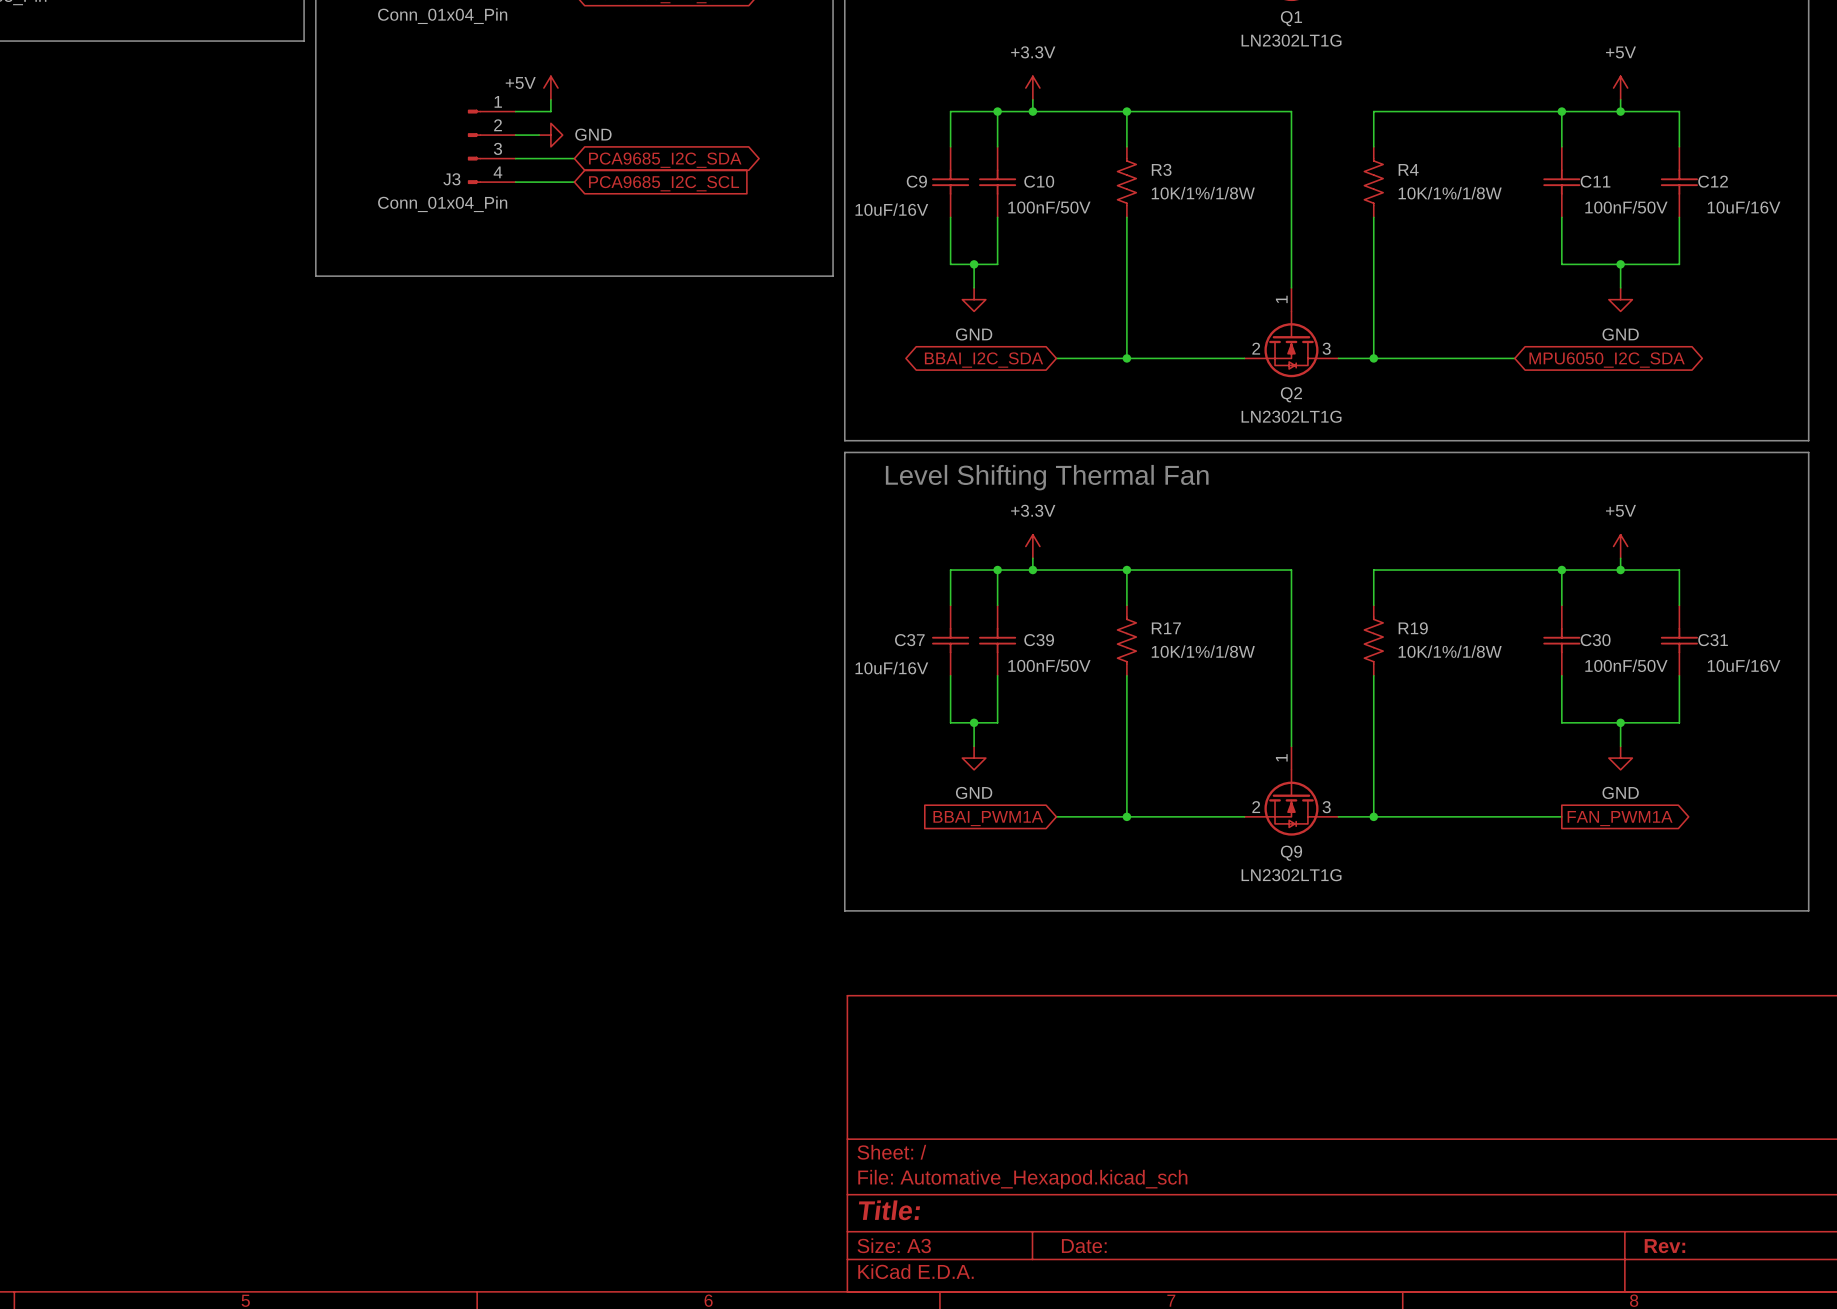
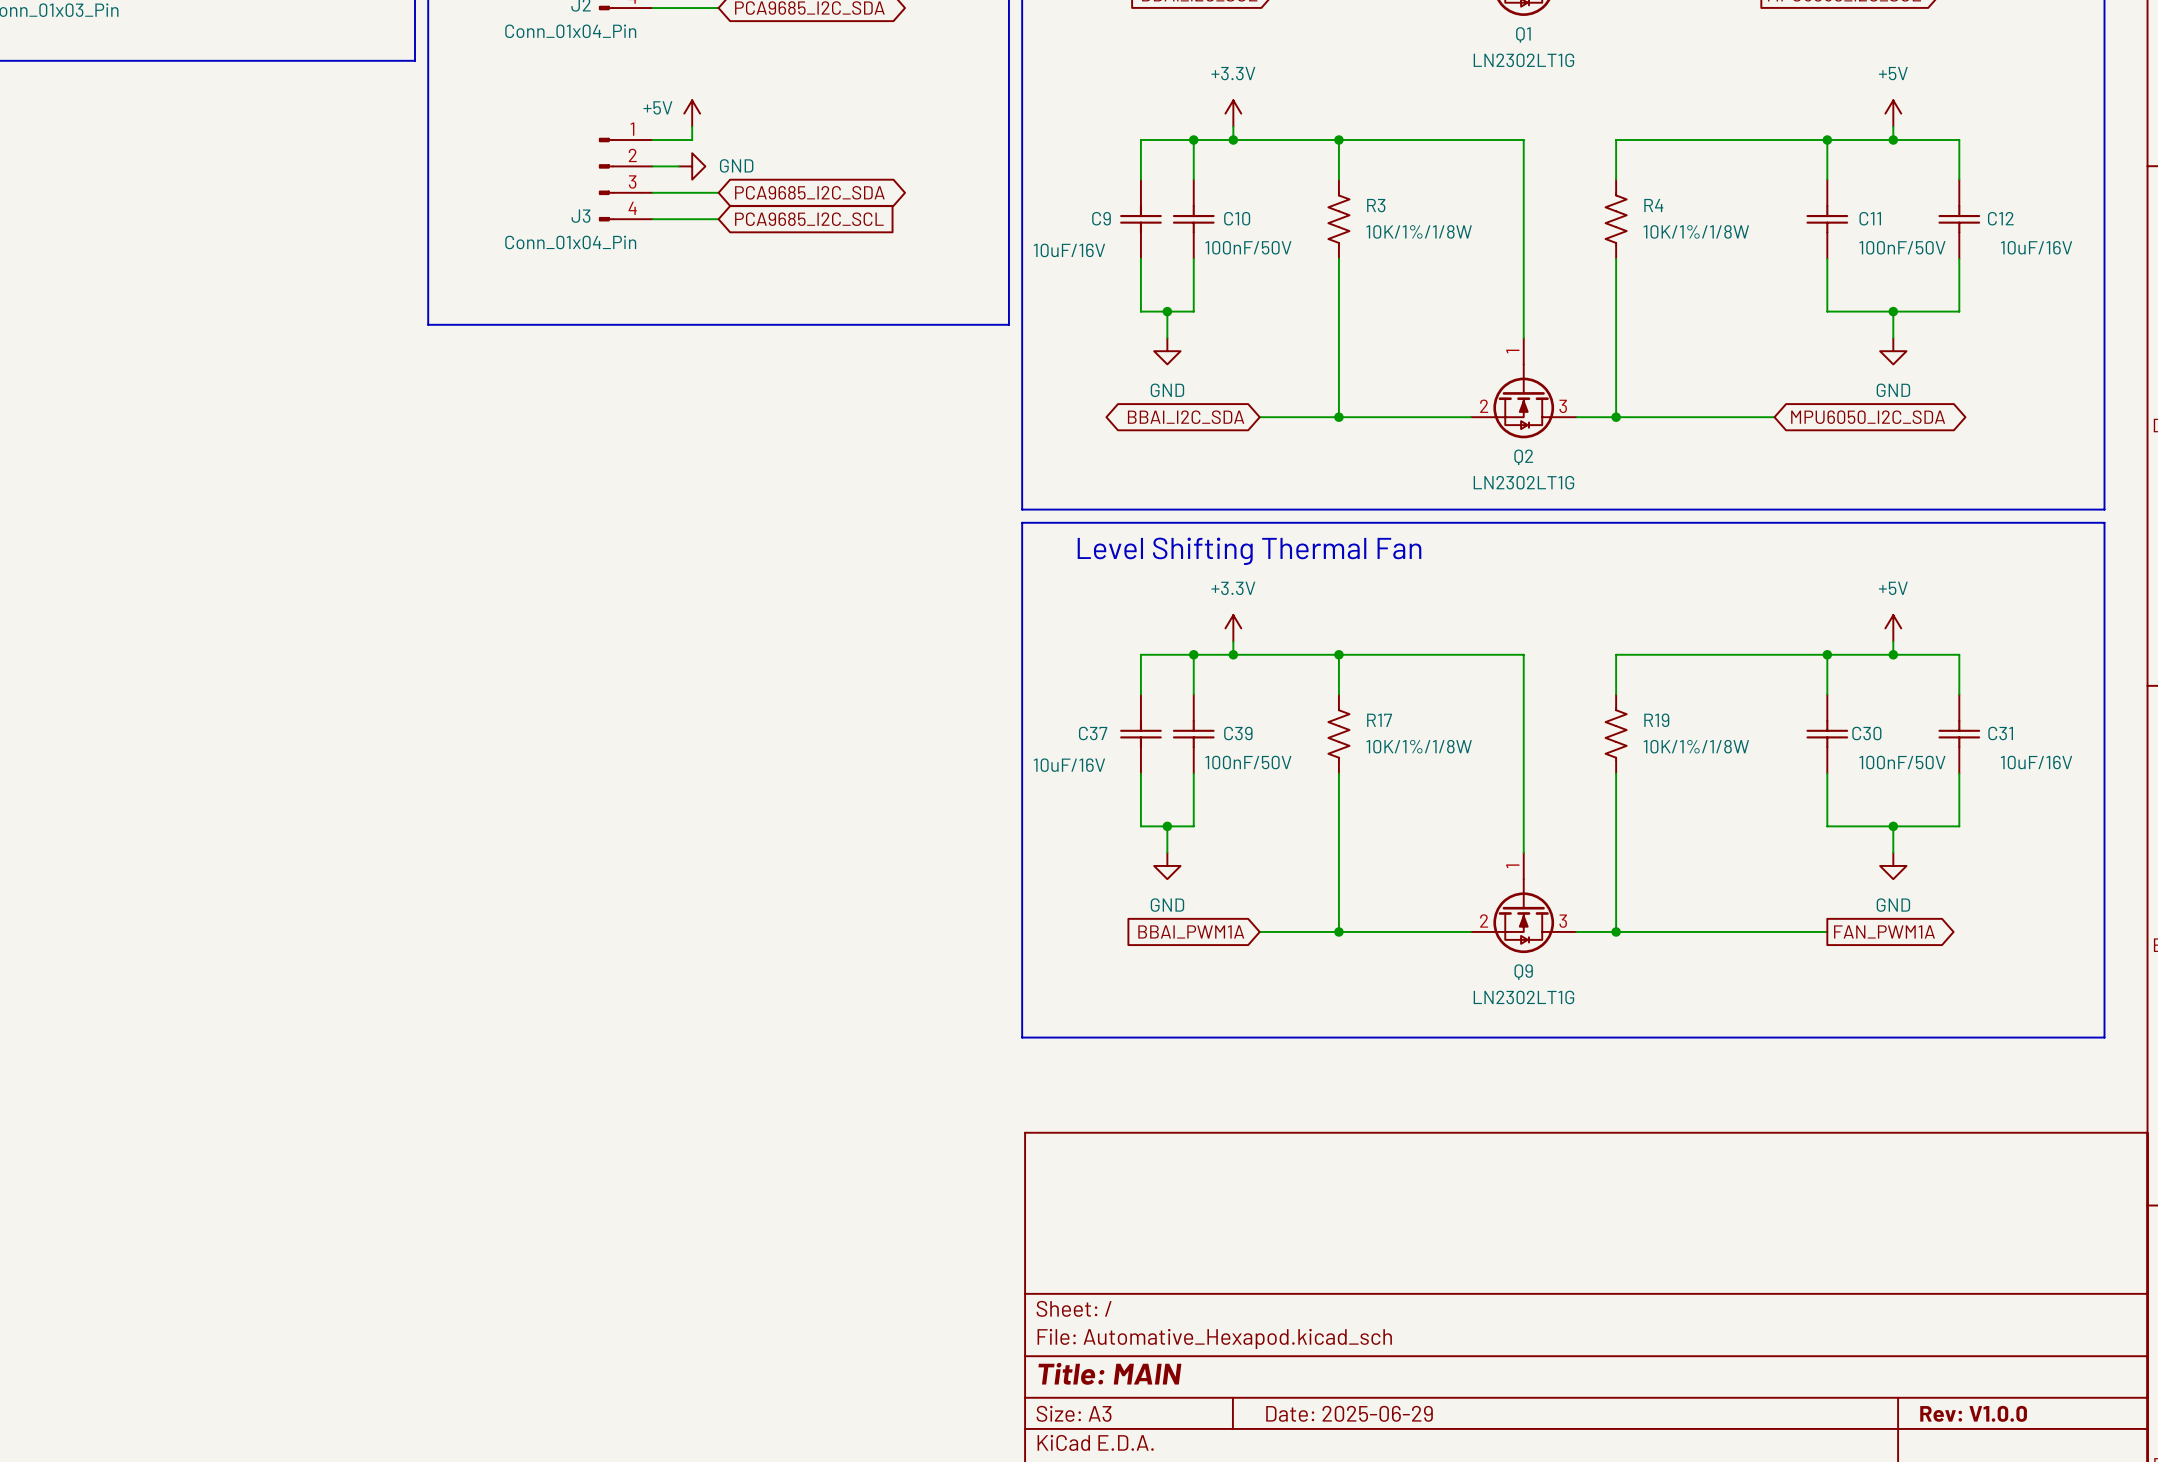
title block: Title: (889, 1210) -> Title: MAIN (1109, 1373)
title block: Date: (1084, 1246) -> Date: 2025-06-29 (1349, 1413)
title block: Rev: (1664, 1246) -> Rev: V1.0.0 (1973, 1413)

